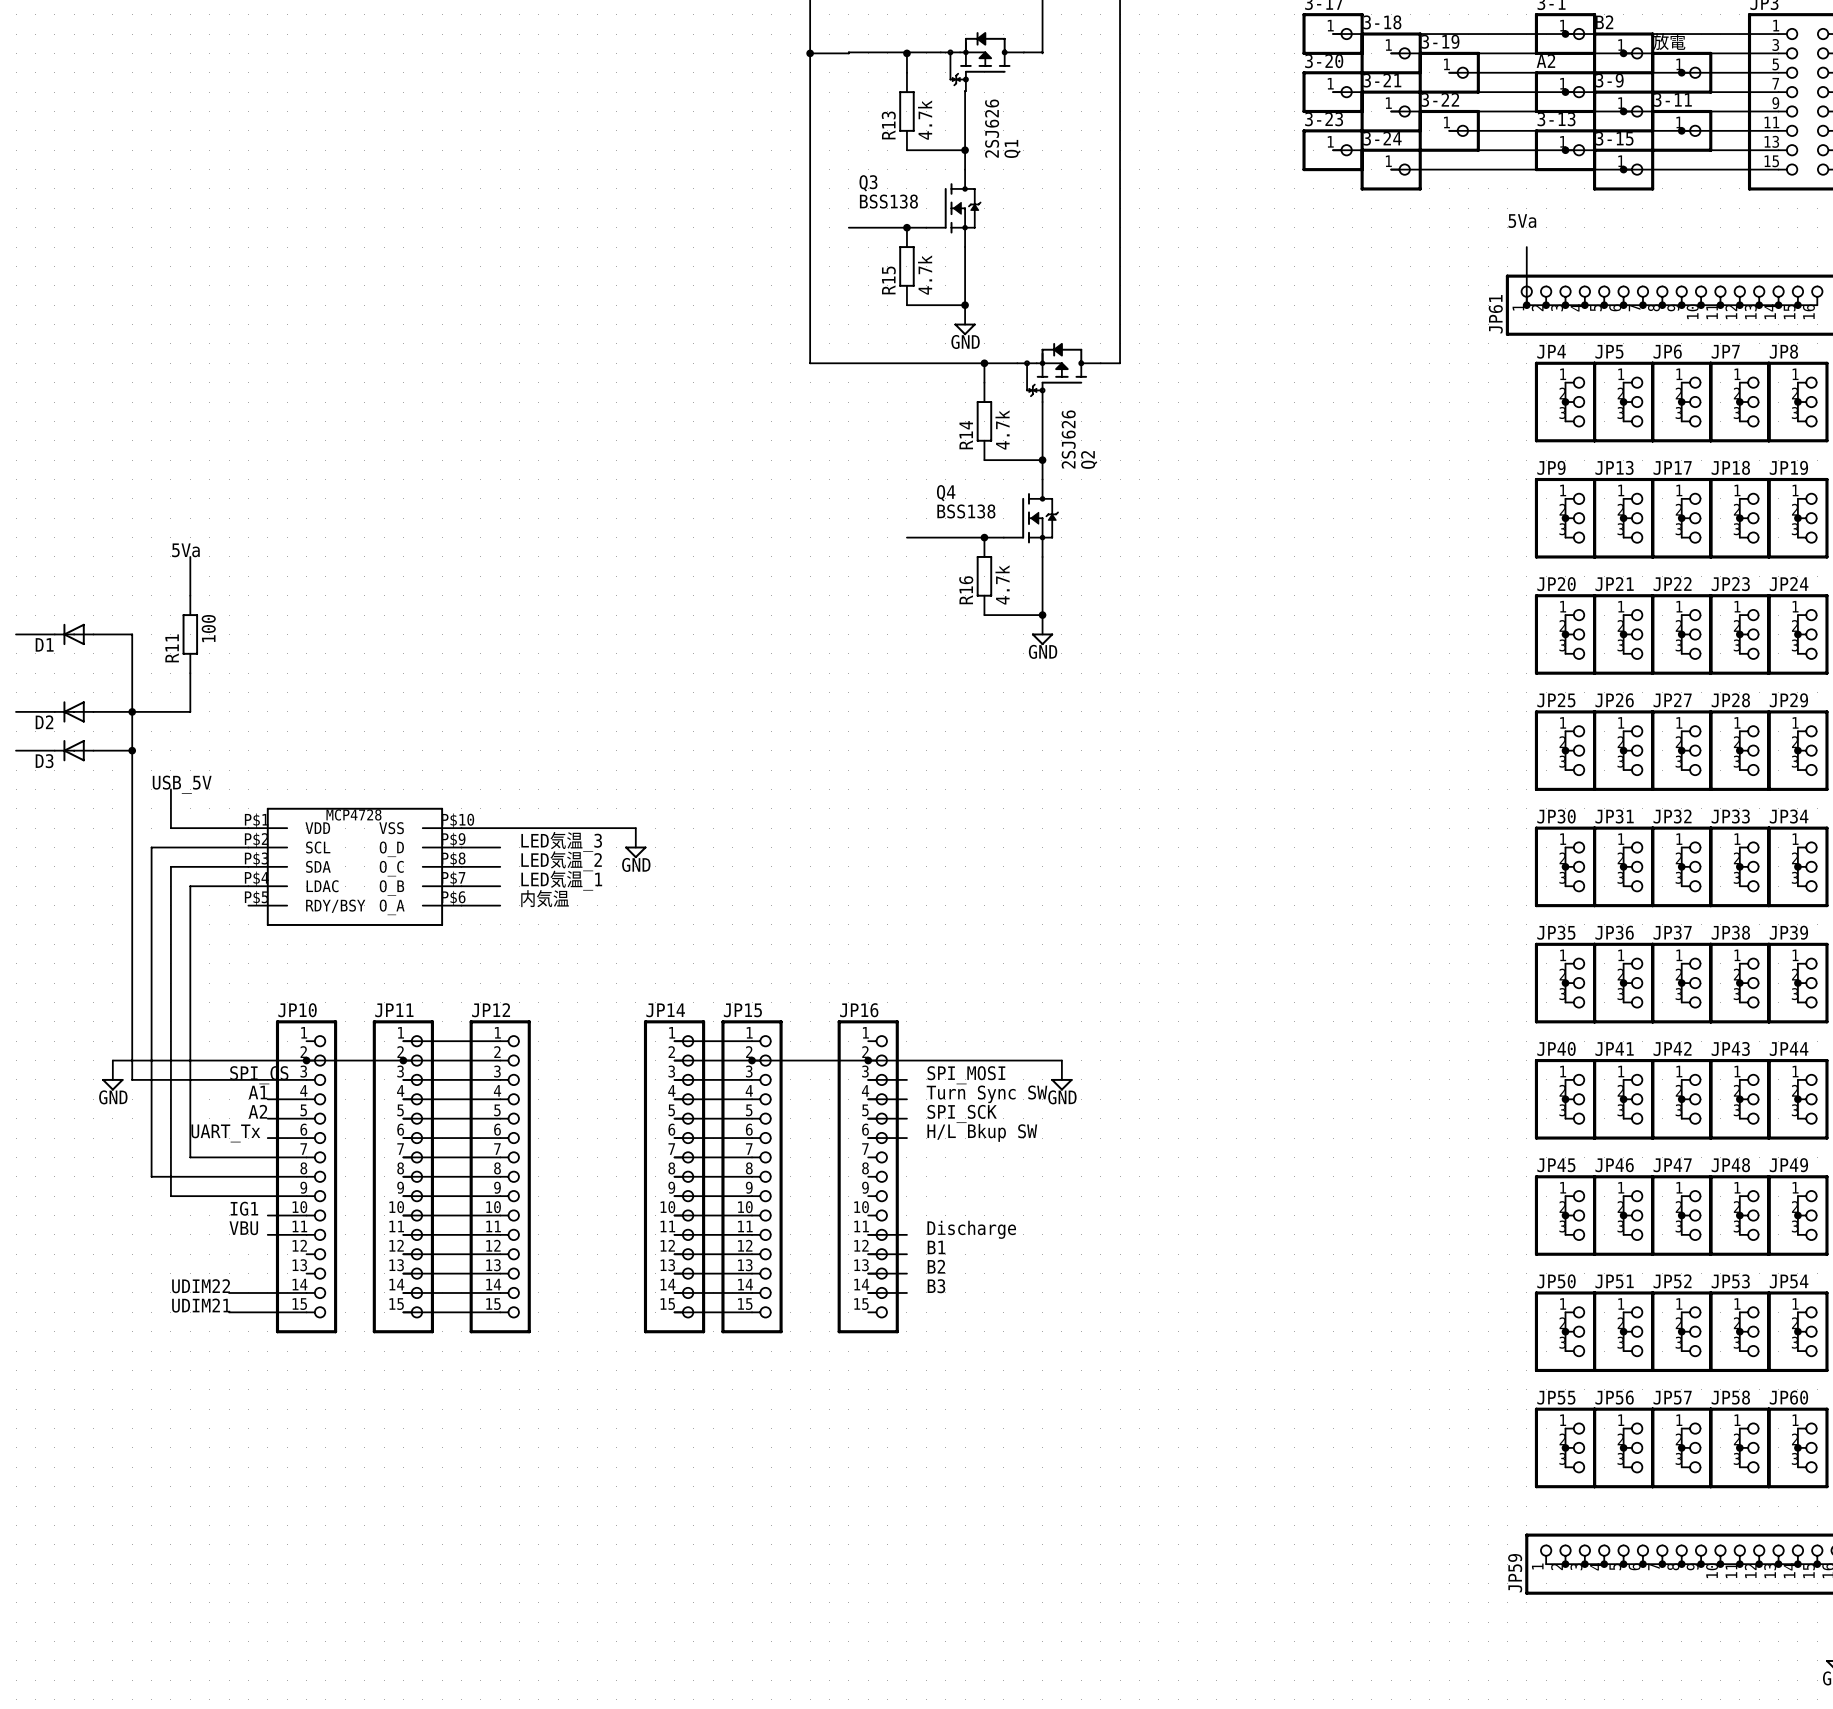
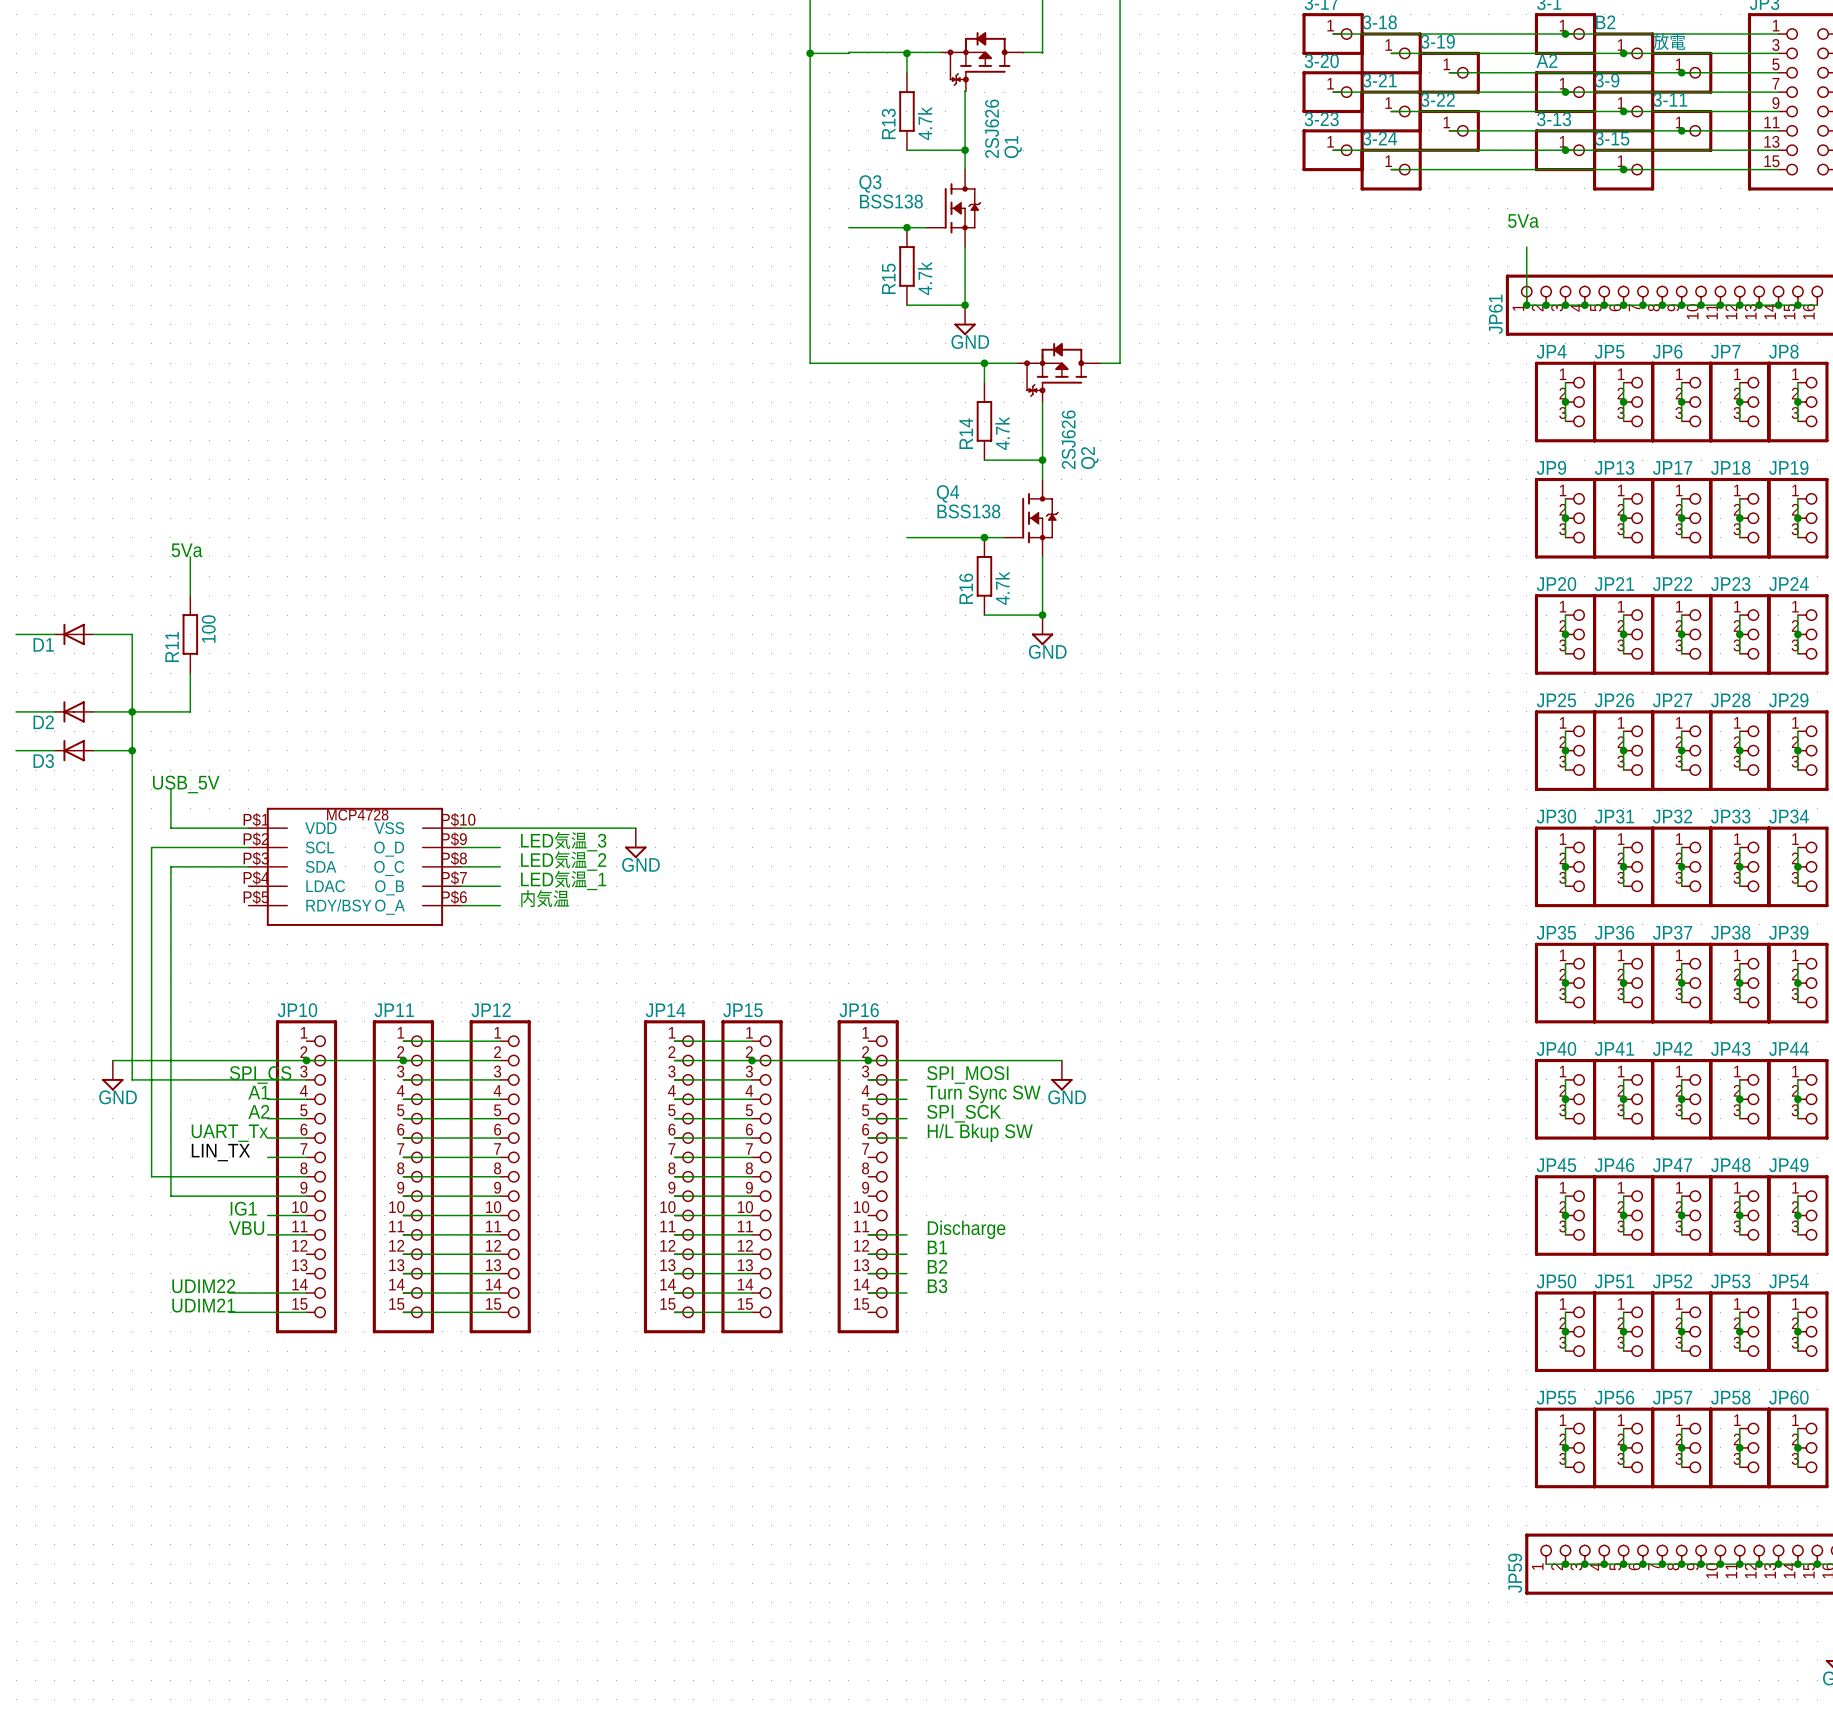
wire: (248, 886) (190, 886) (190, 1157) (267, 1157) -> none
label: none -> LIN_TX (220, 1152)

